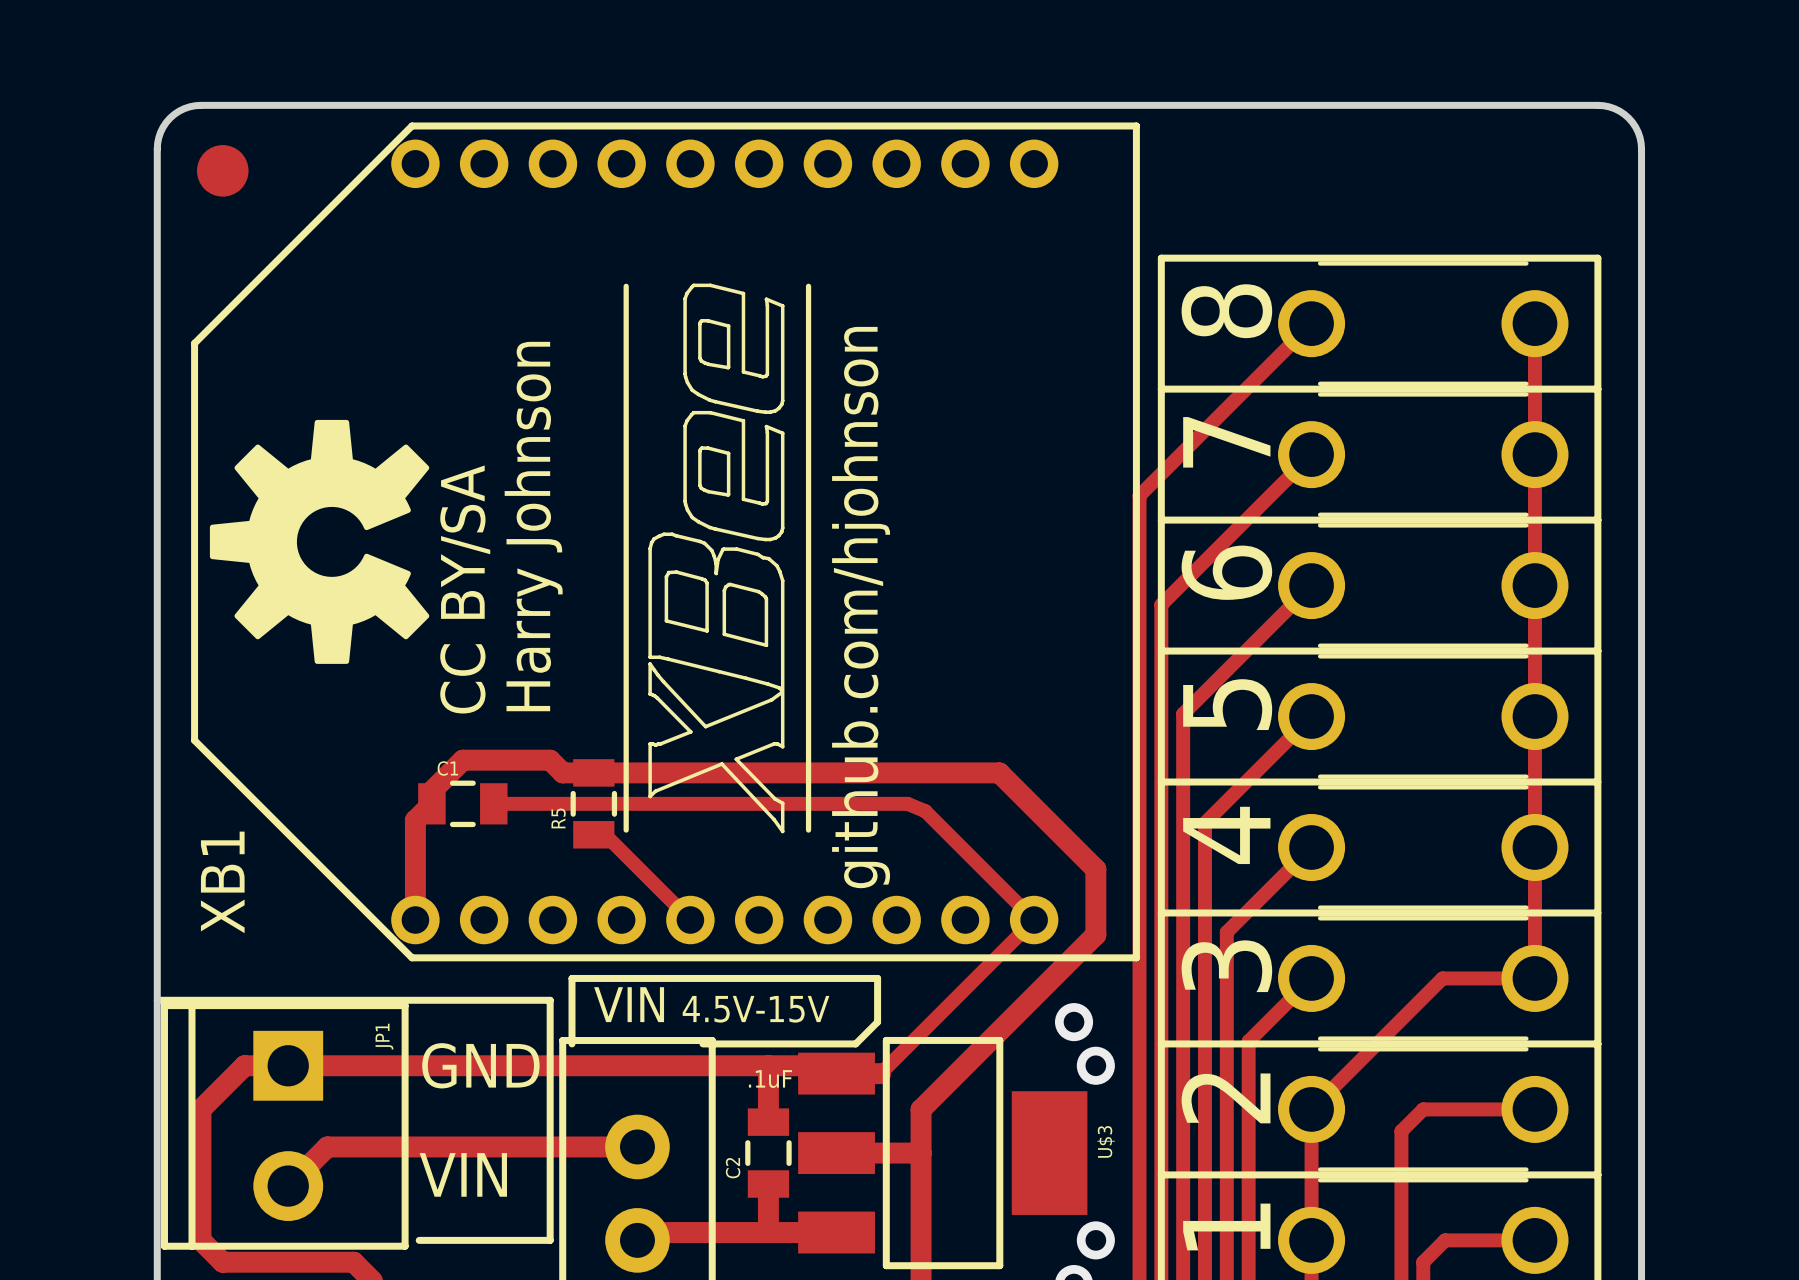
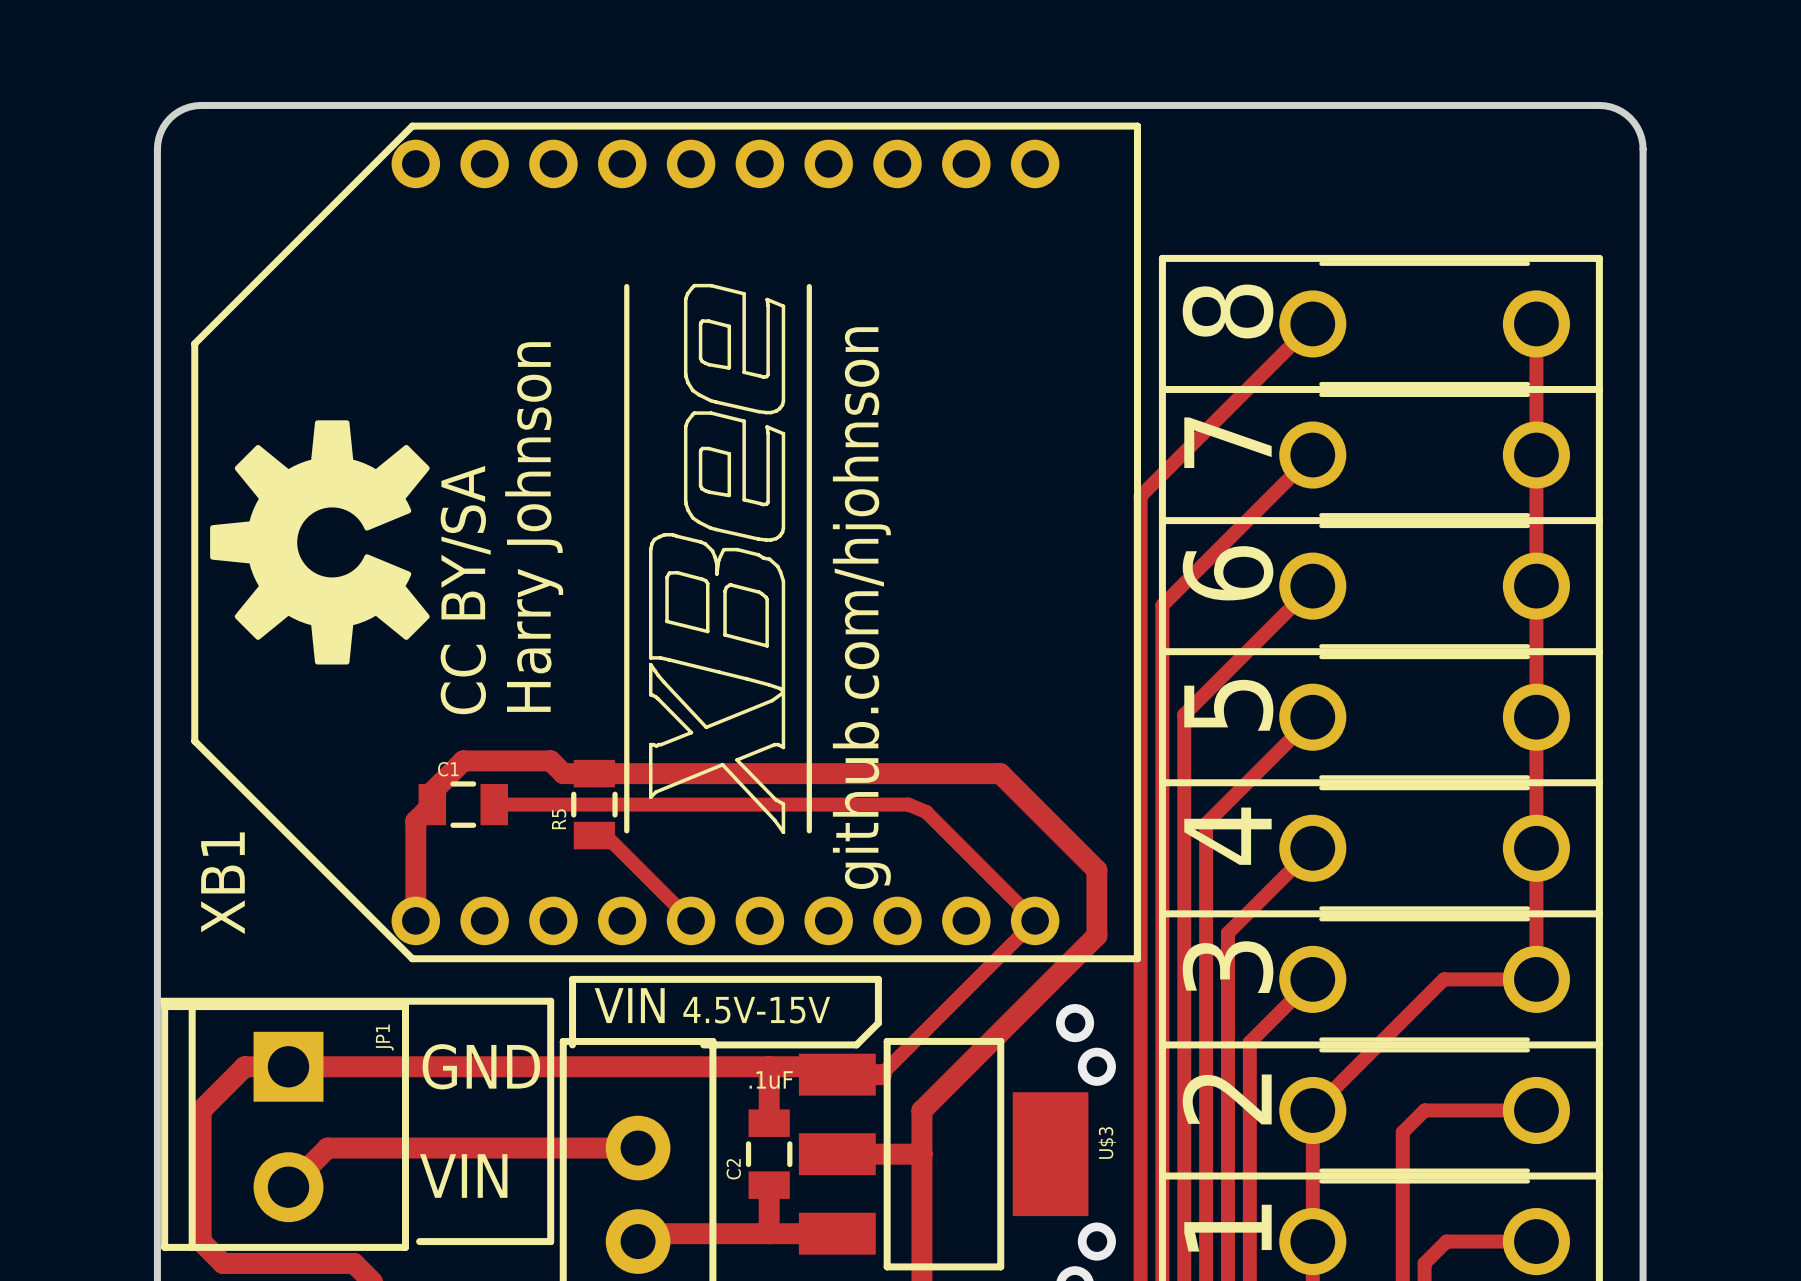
part: (222, 170) -> none

